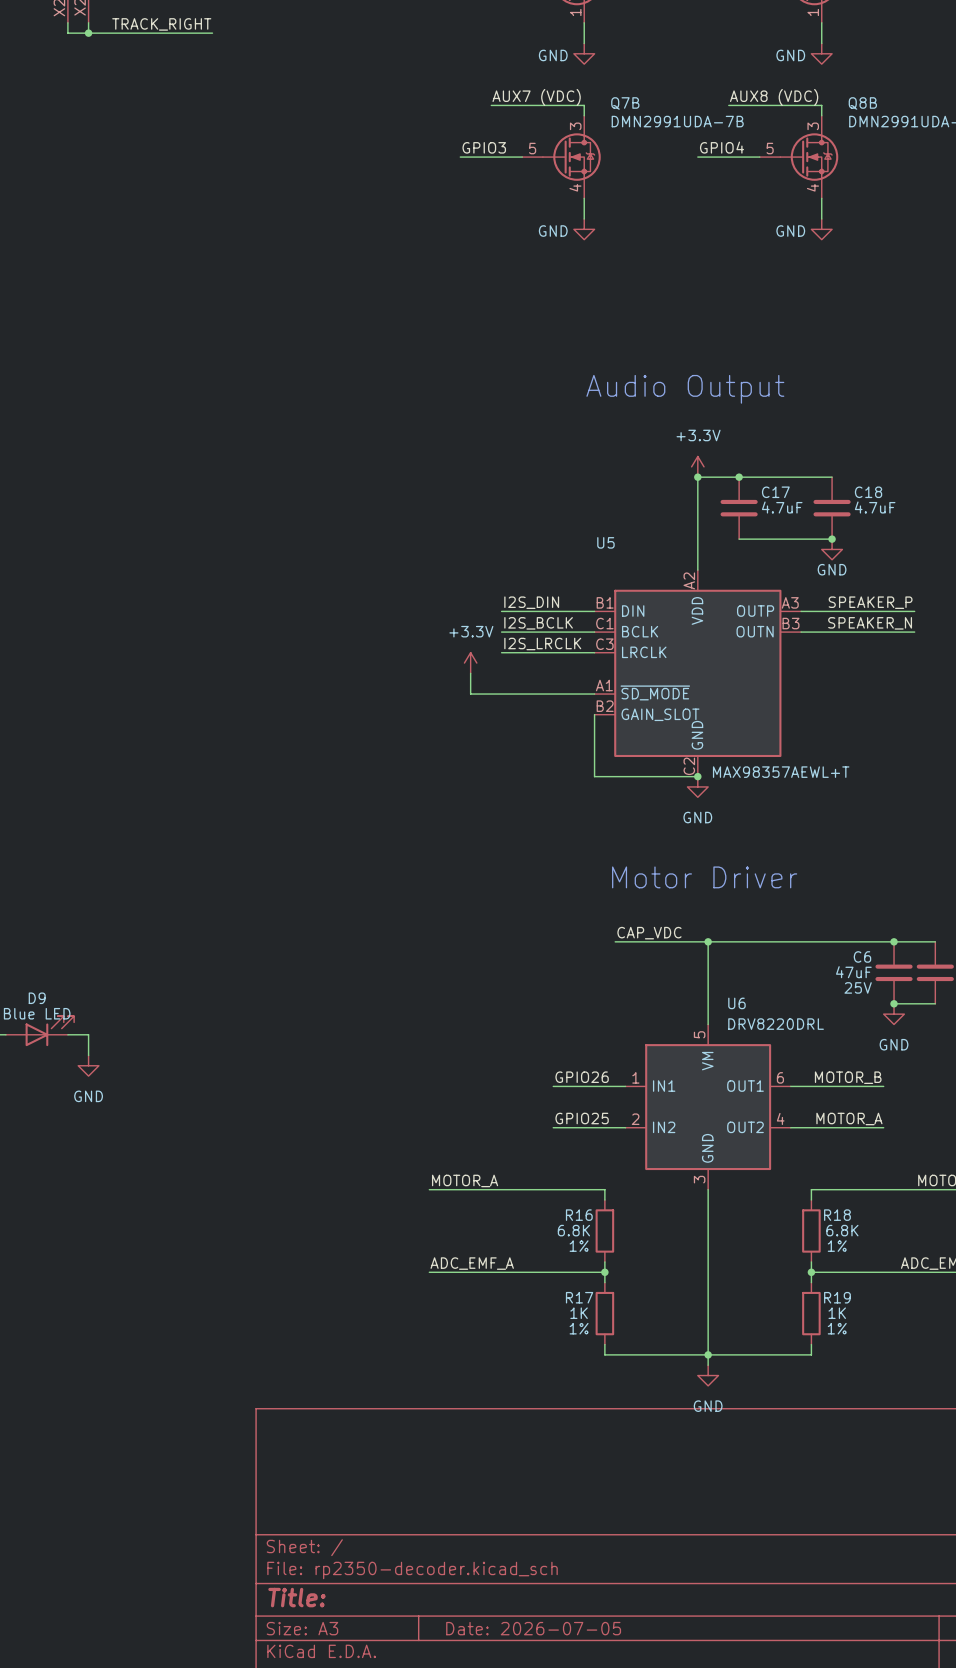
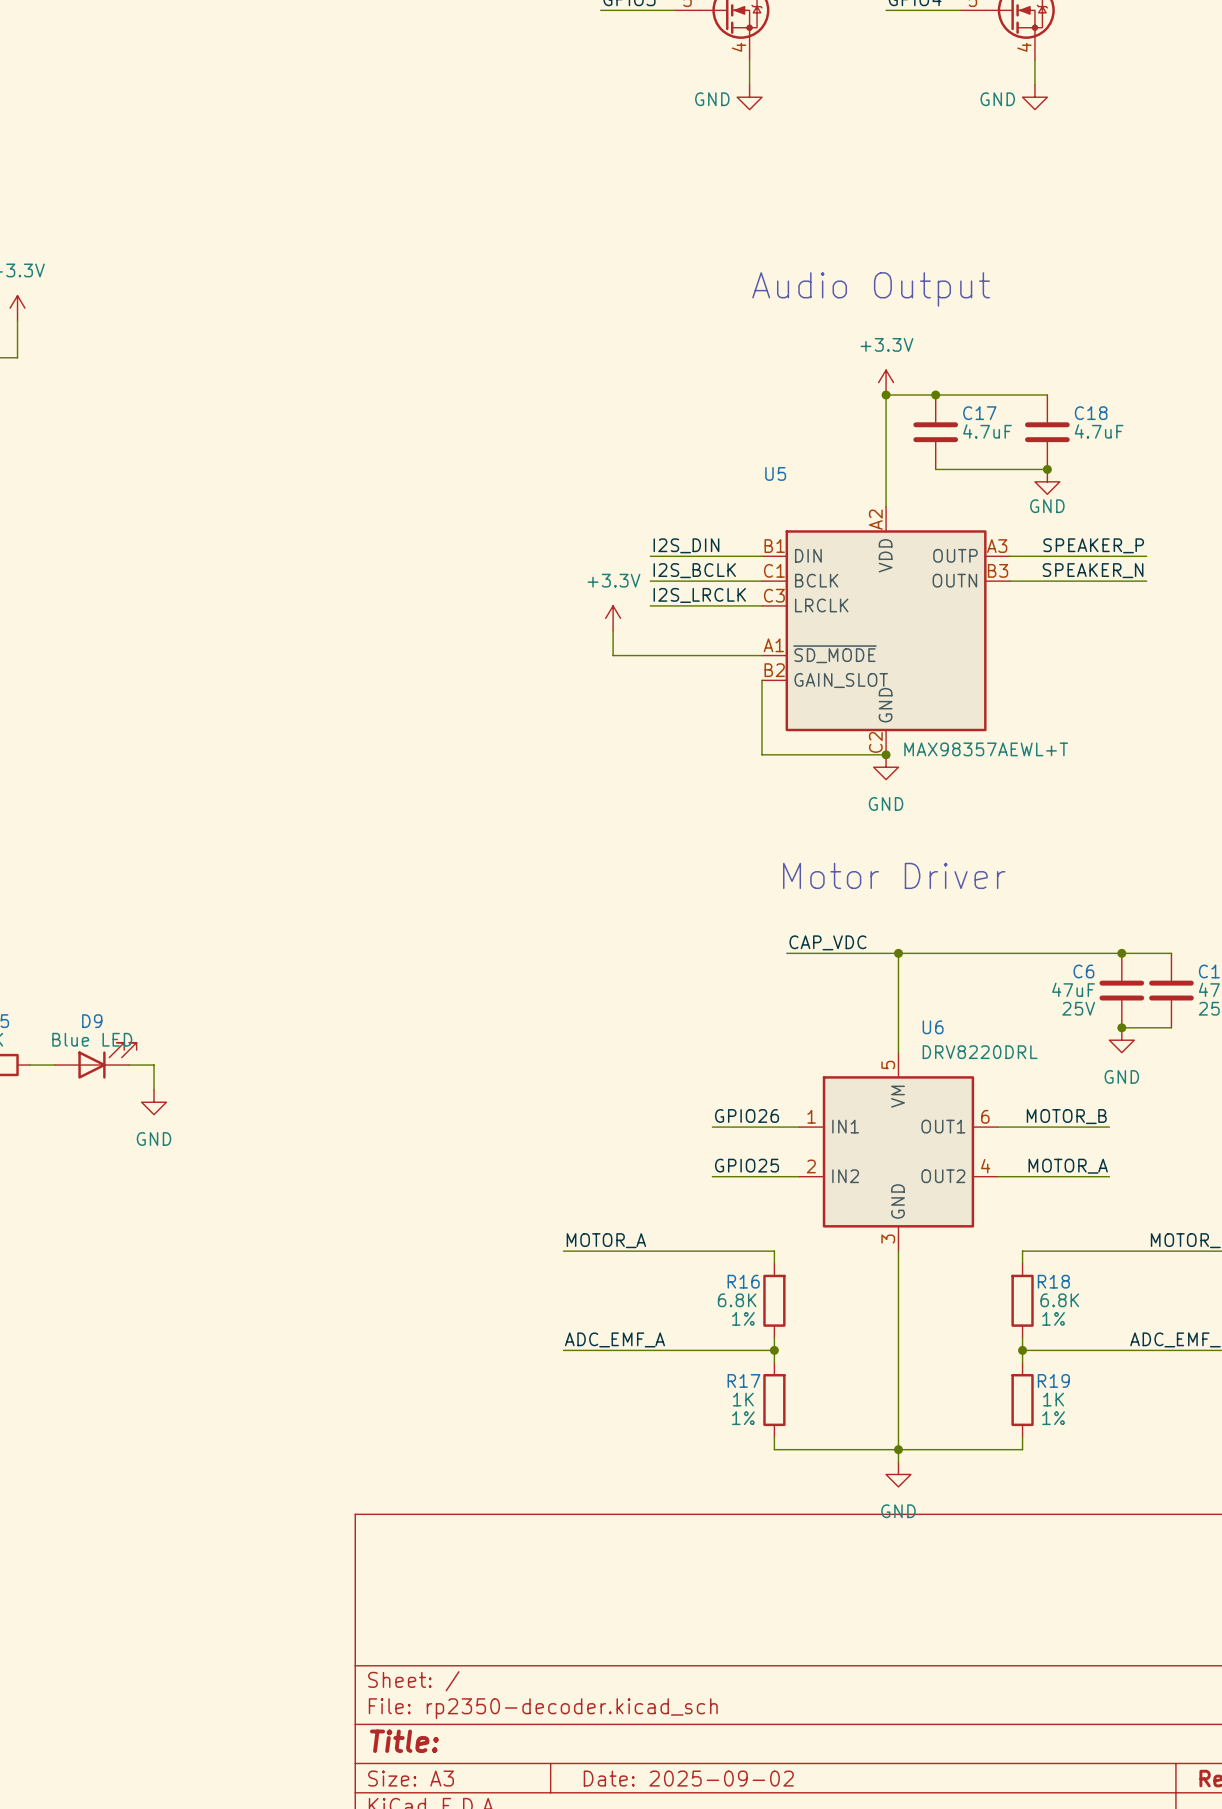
title block: Date: 2026-07-05 (533, 1628) -> Date: 2025-09-02 (688, 1778)

